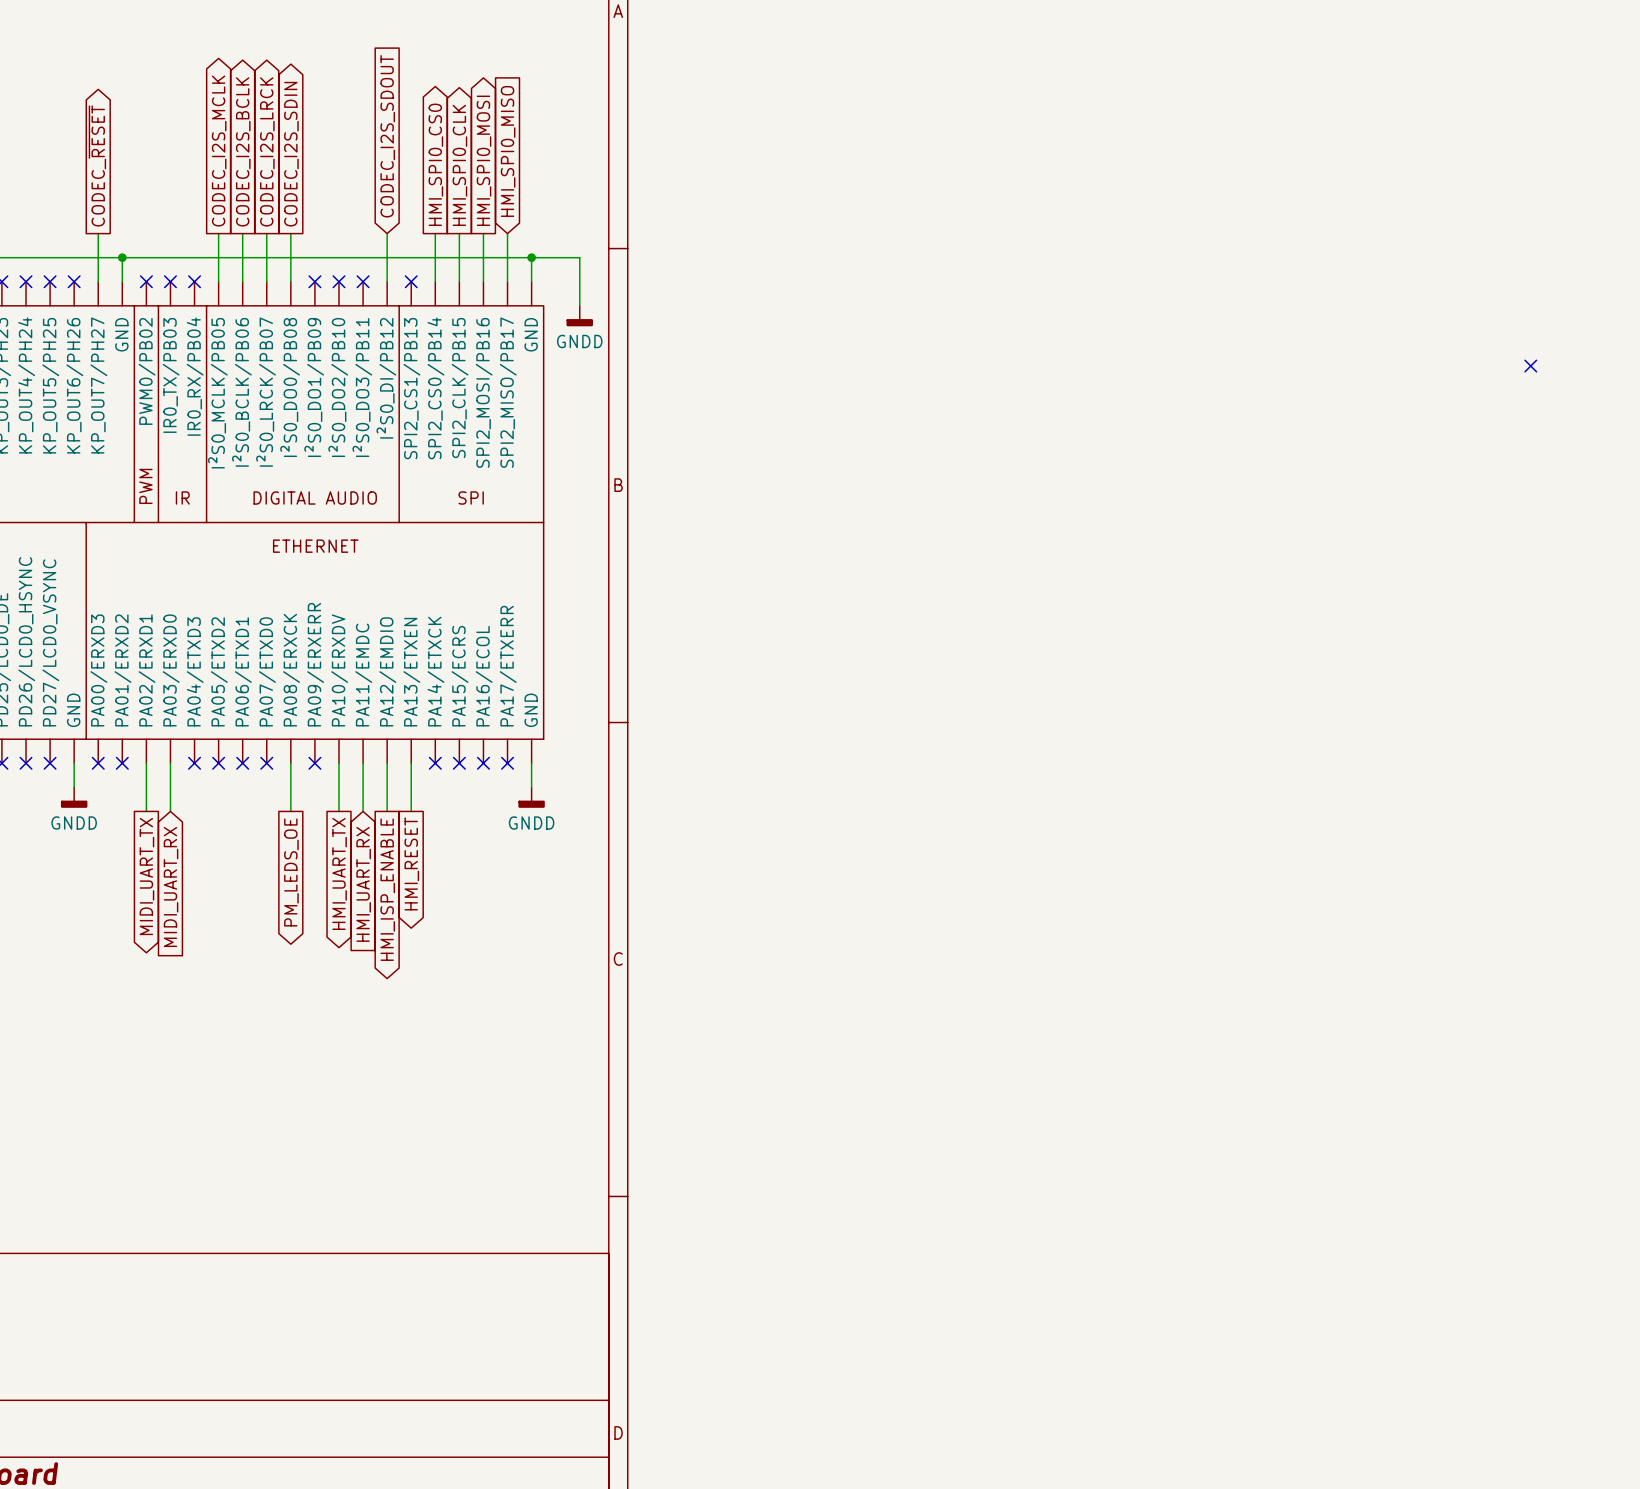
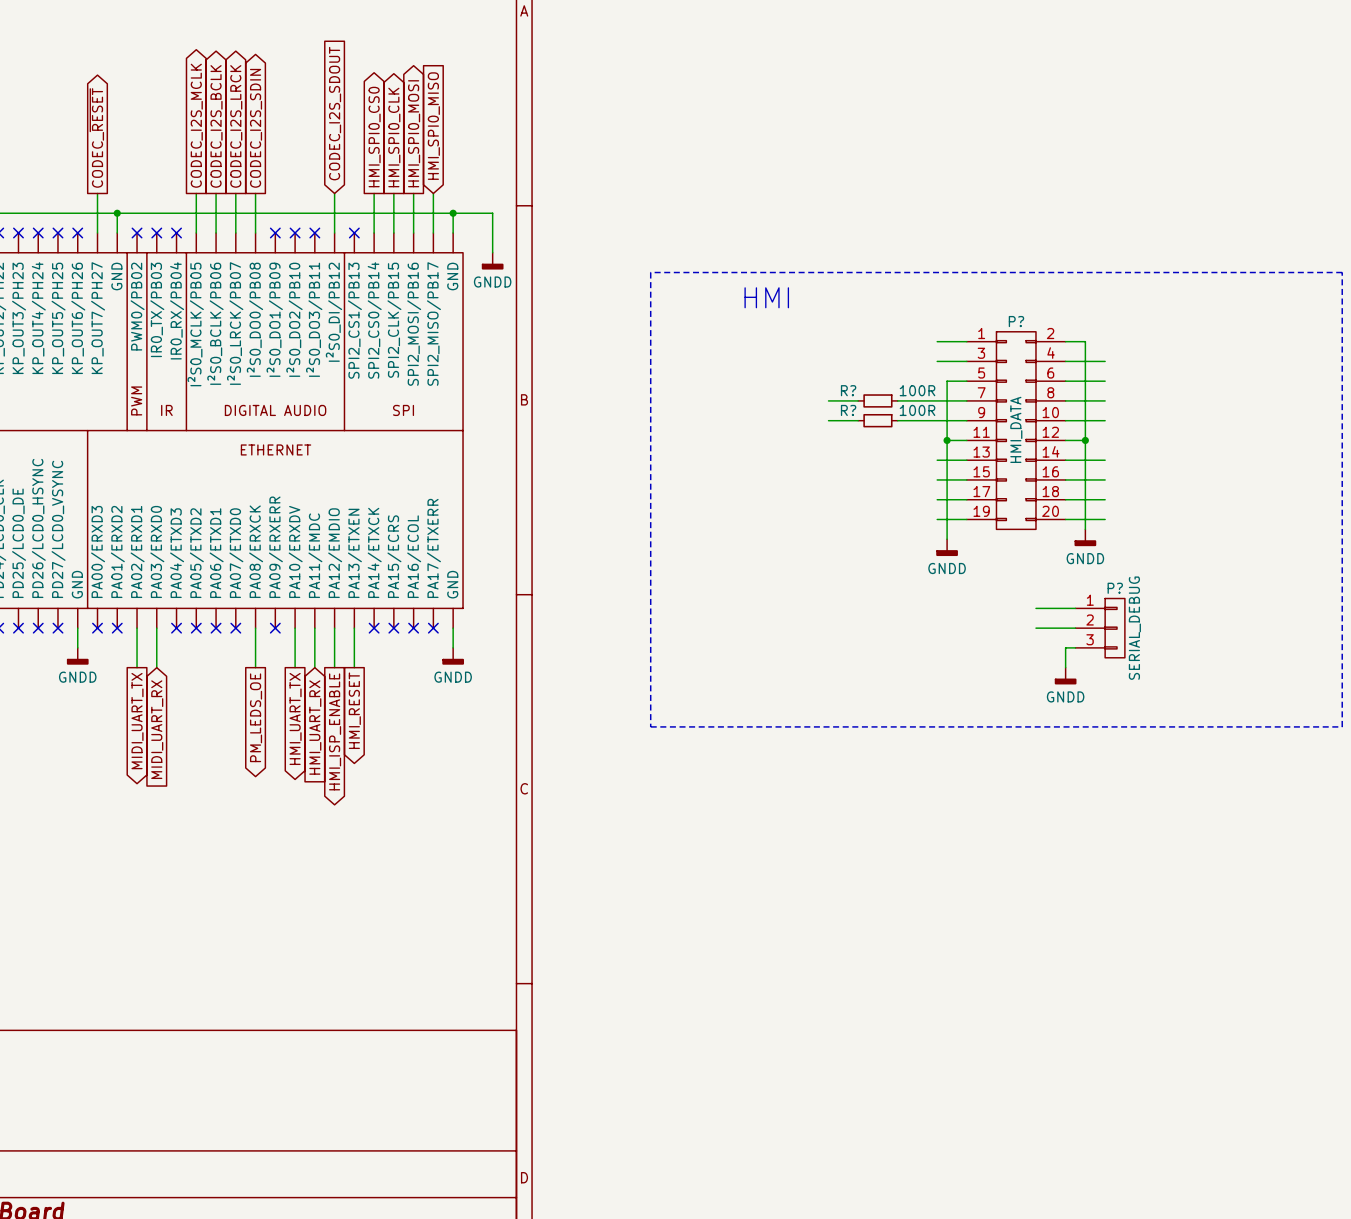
line: none -> (650, 272) (650, 726) (1342, 726) (1342, 272) (650, 272)
text: none -> HMI (766, 297)
no-connect mark: (1530, 366) -> none
wire: none -> (937, 341) (966, 341)
wire: none -> (1065, 341) (1085, 341) (1085, 529)
wire: none -> (937, 361) (966, 361)
wire: none -> (1065, 361) (1105, 361)
wire: none -> (966, 381) (947, 381) (947, 539)
wire: none -> (1065, 381) (1105, 381)
wire: none -> (828, 400) (858, 400)
R?: none -> 100R (877, 400)
wire: none -> (897, 400) (966, 400)
wire: none -> (1065, 400) (1105, 400)
wire: none -> (828, 420) (858, 420)
R?: none -> 100R (877, 420)
wire: none -> (897, 420) (966, 420)
wire: none -> (1065, 420) (1105, 420)
P?: none -> HMI_DATA (1016, 430)
wire: none -> (947, 440) (966, 440)
junction: none -> (947, 440)
wire: none -> (1065, 440) (1085, 440)
junction: none -> (1085, 440)
wire: none -> (937, 460) (966, 460)
wire: none -> (1065, 460) (1105, 460)
wire: none -> (937, 479) (966, 479)
wire: none -> (1065, 479) (1105, 479)
wire: none -> (937, 499) (966, 499)
wire: none -> (1065, 499) (1105, 499)
wire: none -> (937, 519) (966, 519)
wire: none -> (1065, 519) (1105, 519)
power symbol: none -> GNDD (1085, 537)
power symbol: none -> GNDD (947, 547)
wire: none -> (1035, 608) (1075, 608)
wire: none -> (1035, 628) (1075, 628)
P?: none -> SERIAL_DEBUG (1100, 628)
wire: none -> (1075, 647) (1065, 647) (1065, 667)
power symbol: none -> GNDD (1065, 676)

